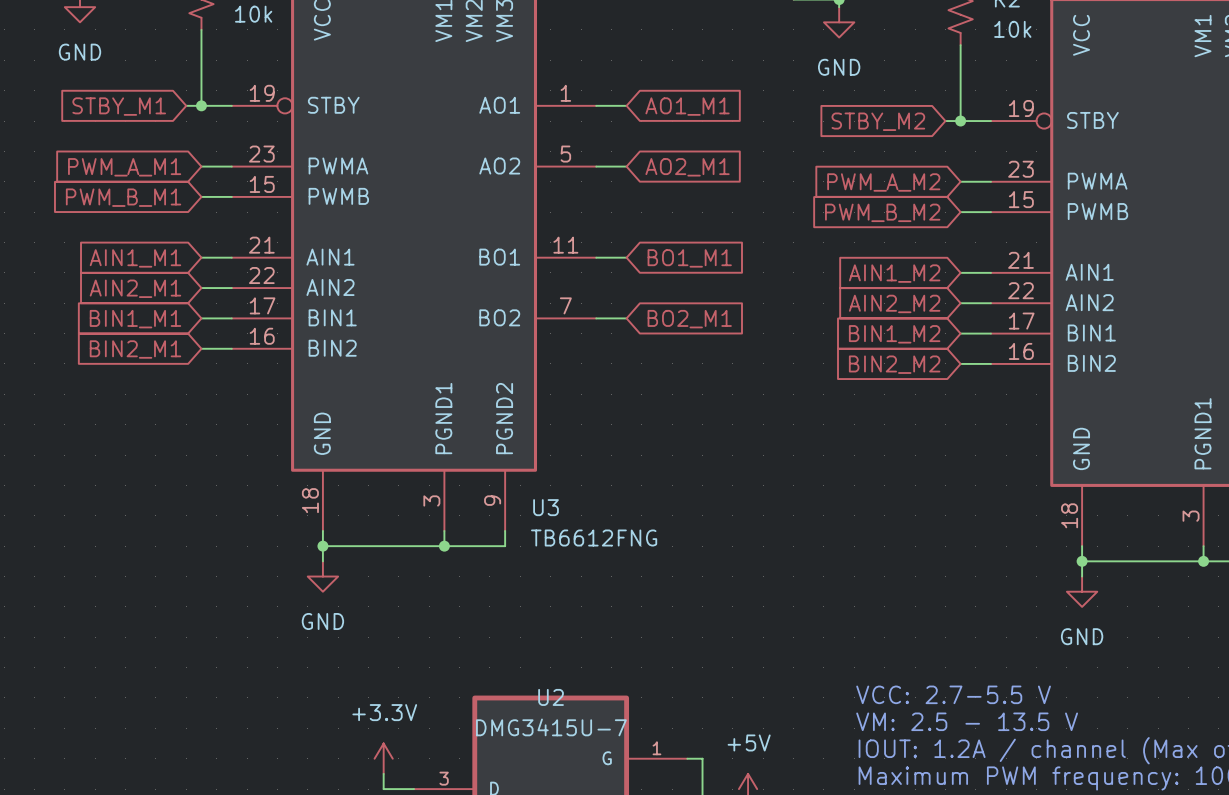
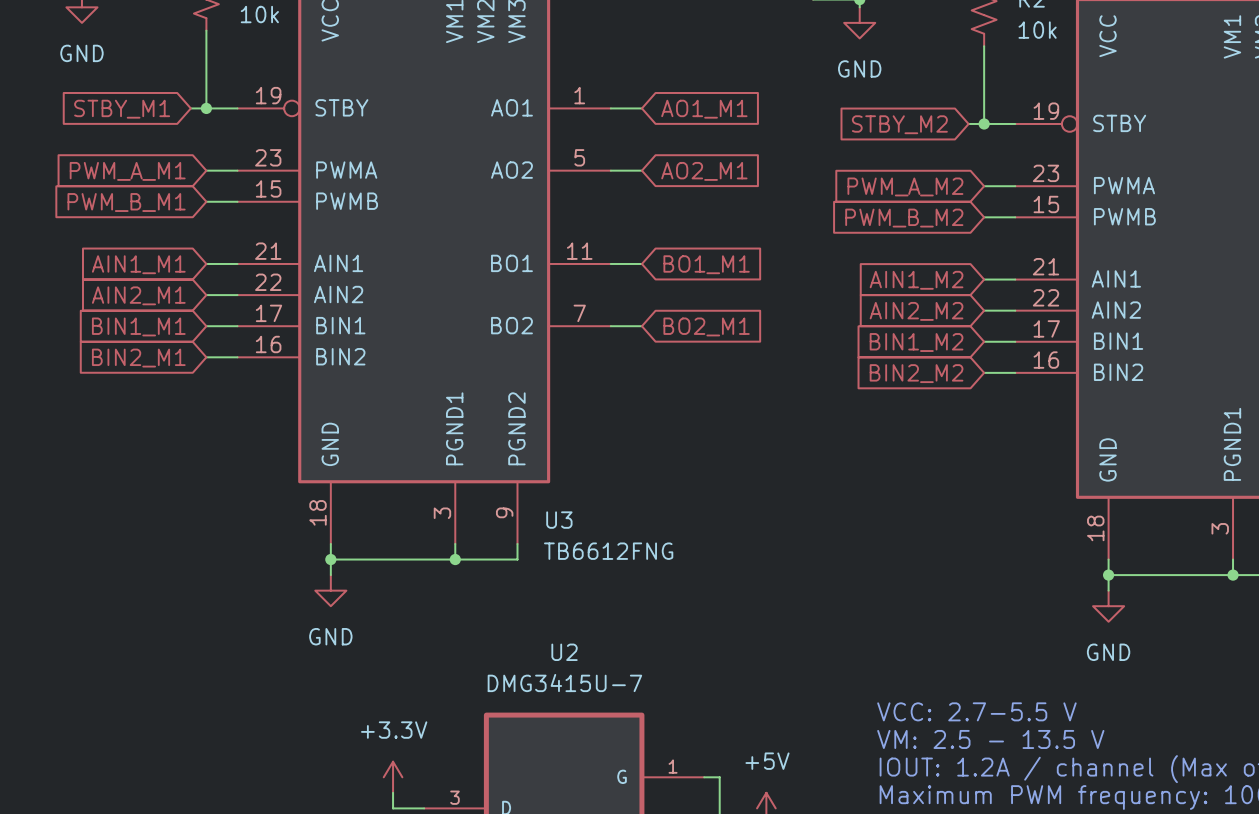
U2 name position: U2 (551, 697) -> U2 (564, 652)
U2 value position: DMG3415U-7 (551, 727) -> DMG3415U-7 (564, 683)

